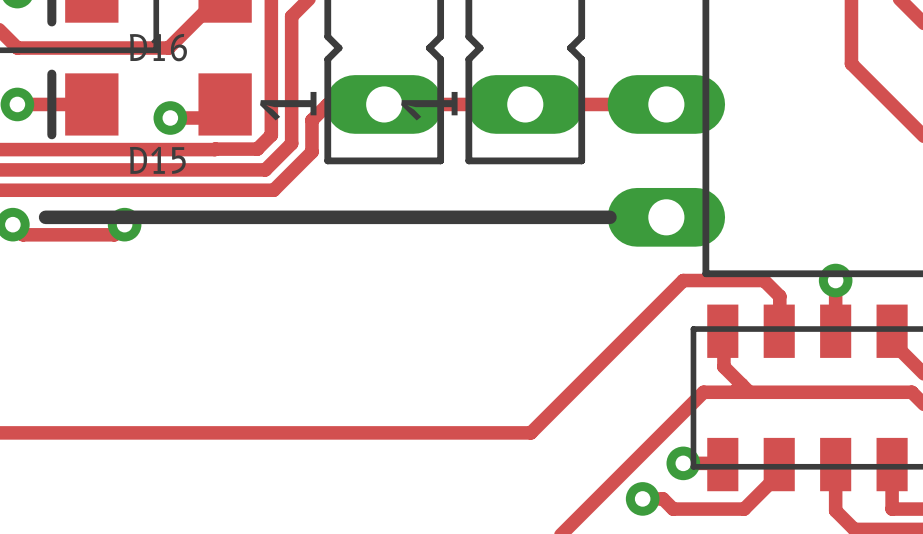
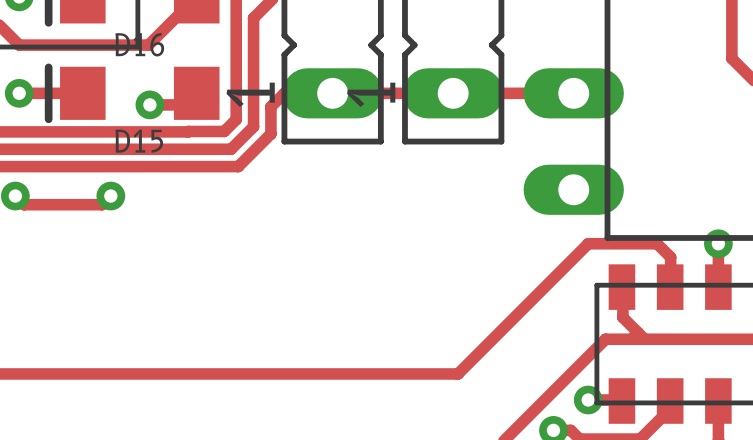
line: (45, 217) (609, 217) -> none

